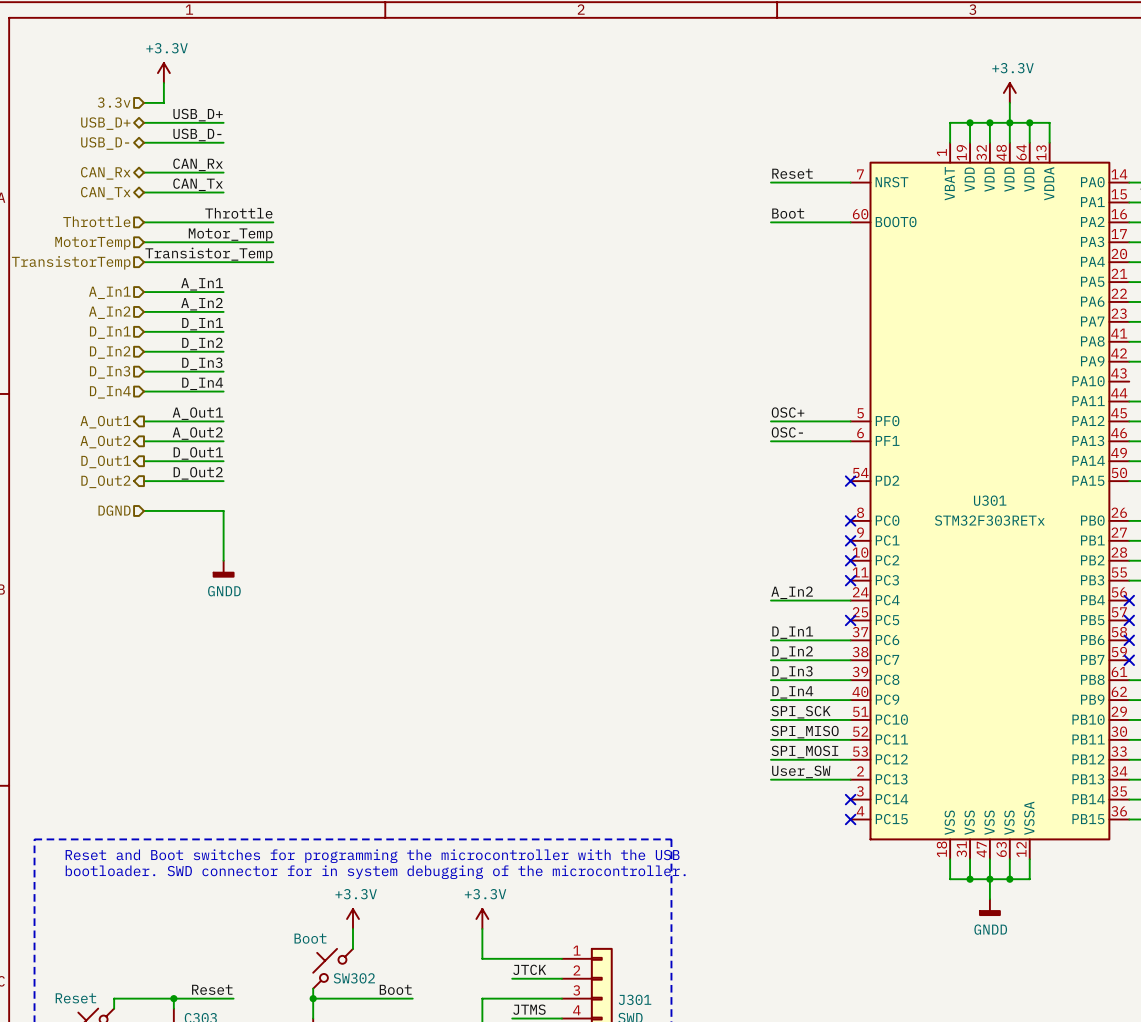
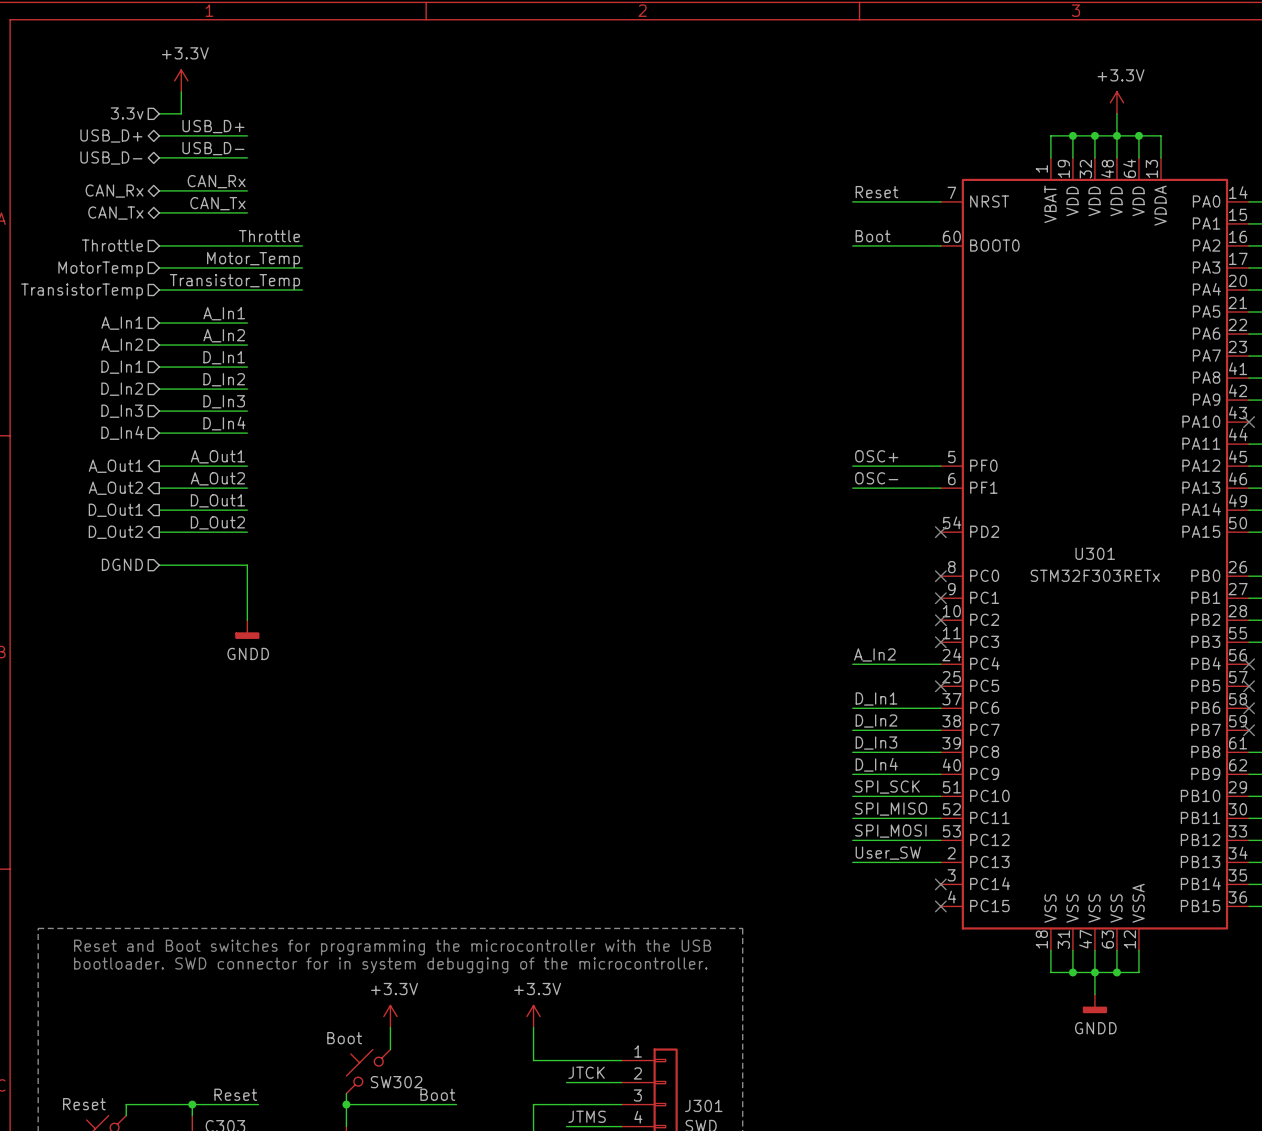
no-connect mark: none -> (1249, 422)

